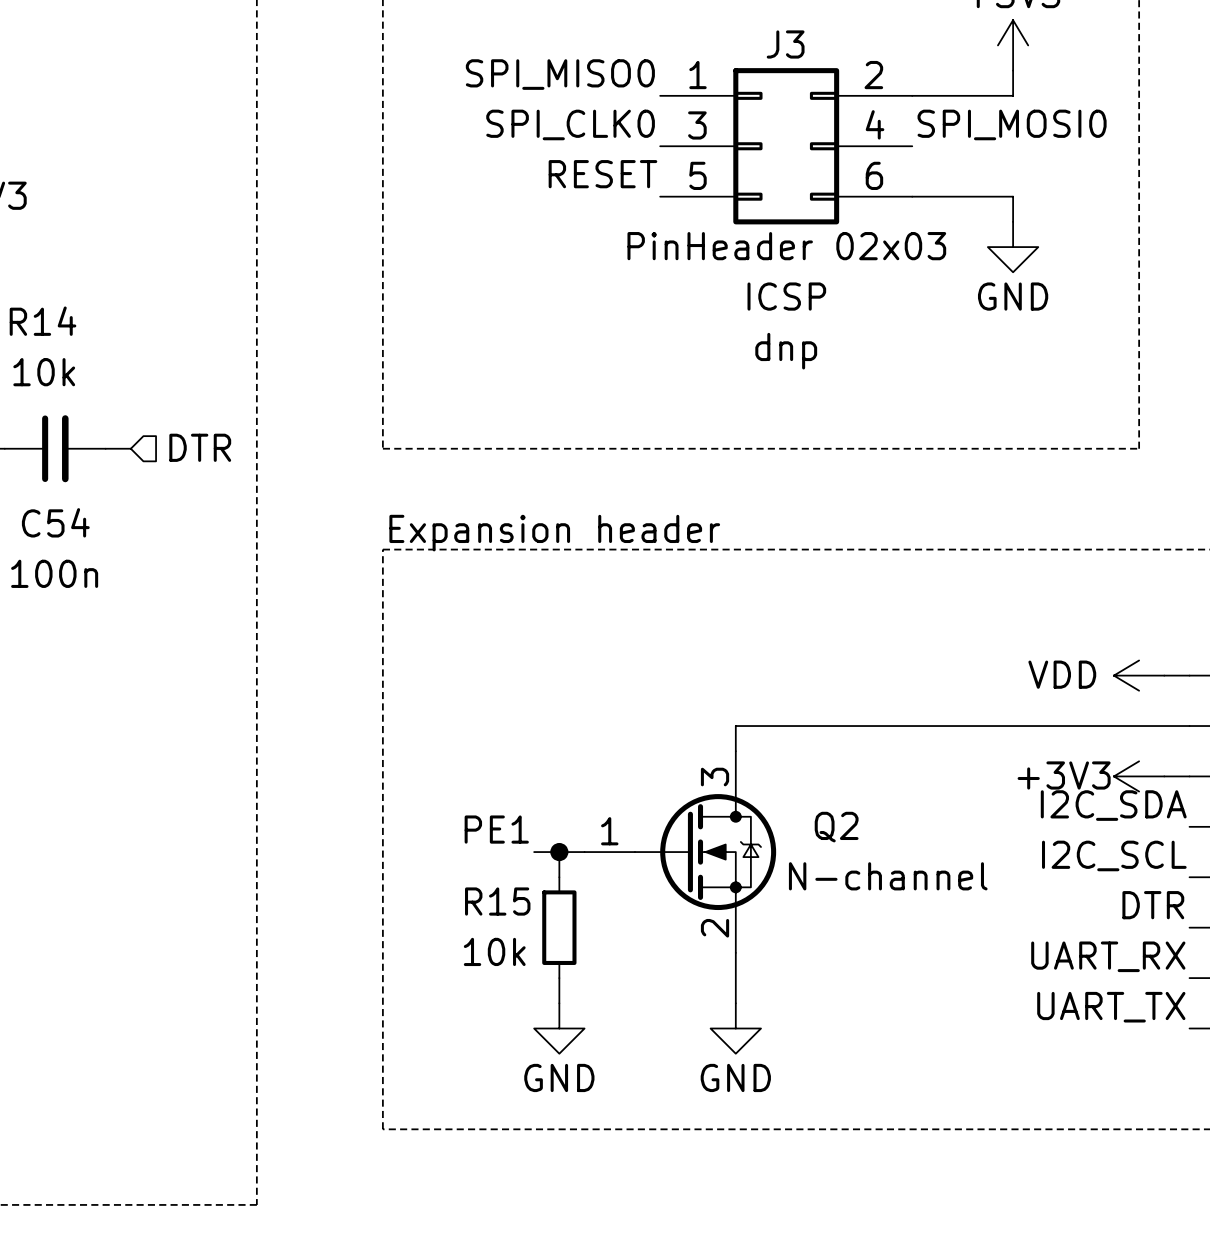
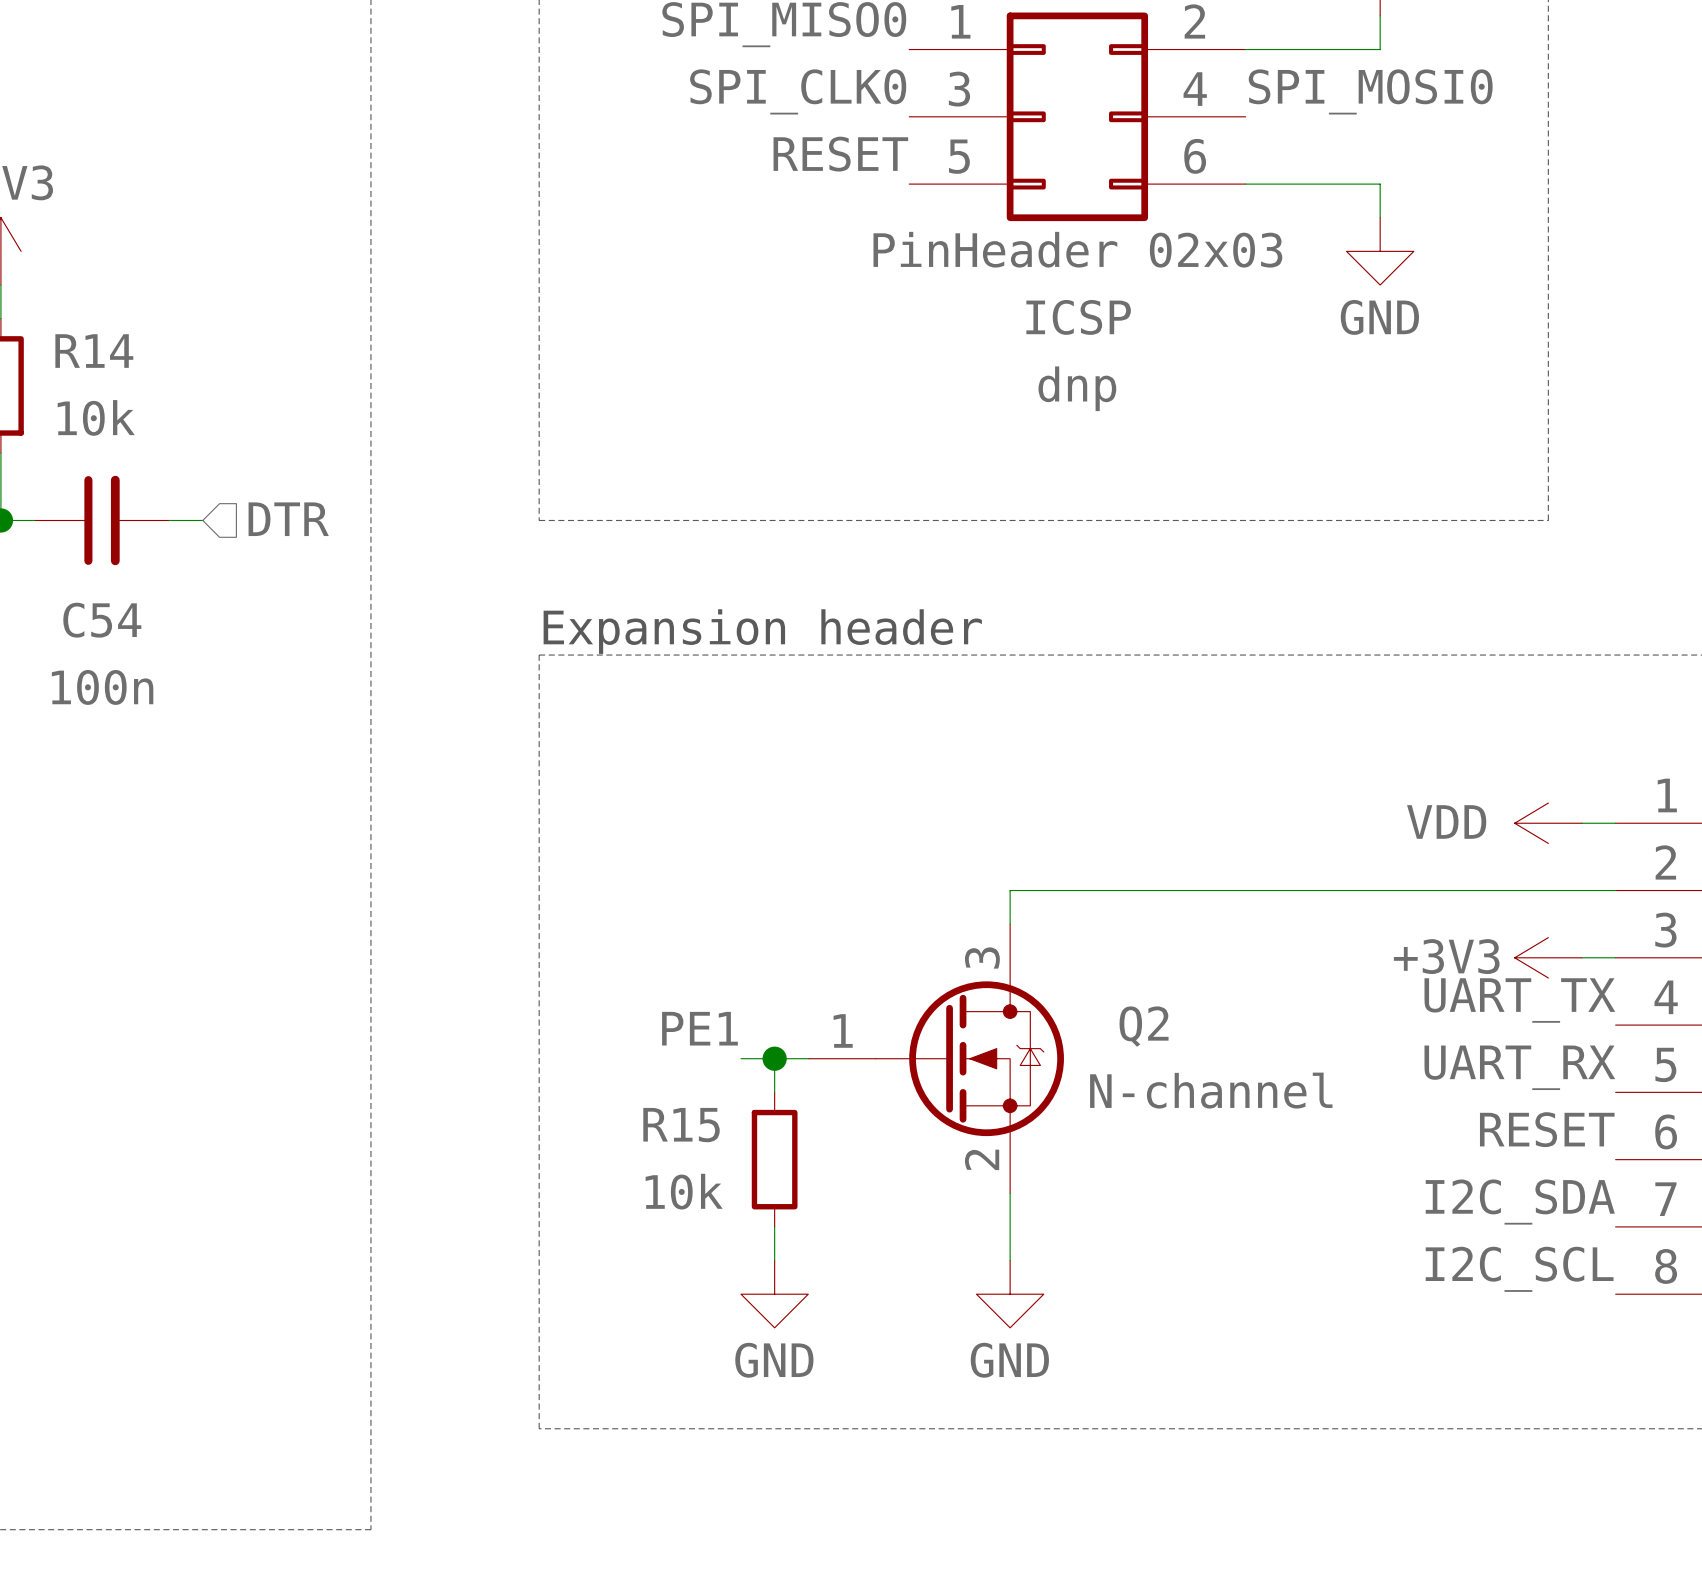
label: I2C_SDA (1113, 805) -> UART_TX (1519, 1000)
label: I2C_SCL (1114, 855) -> UART_RX (1519, 1067)
label: DTR (1153, 905) -> RESET (1547, 1129)
label: UART_RX (1108, 956) -> I2C_SDA (1520, 1202)
label: UART_TX (1111, 1007) -> I2C_SCL (1519, 1269)

